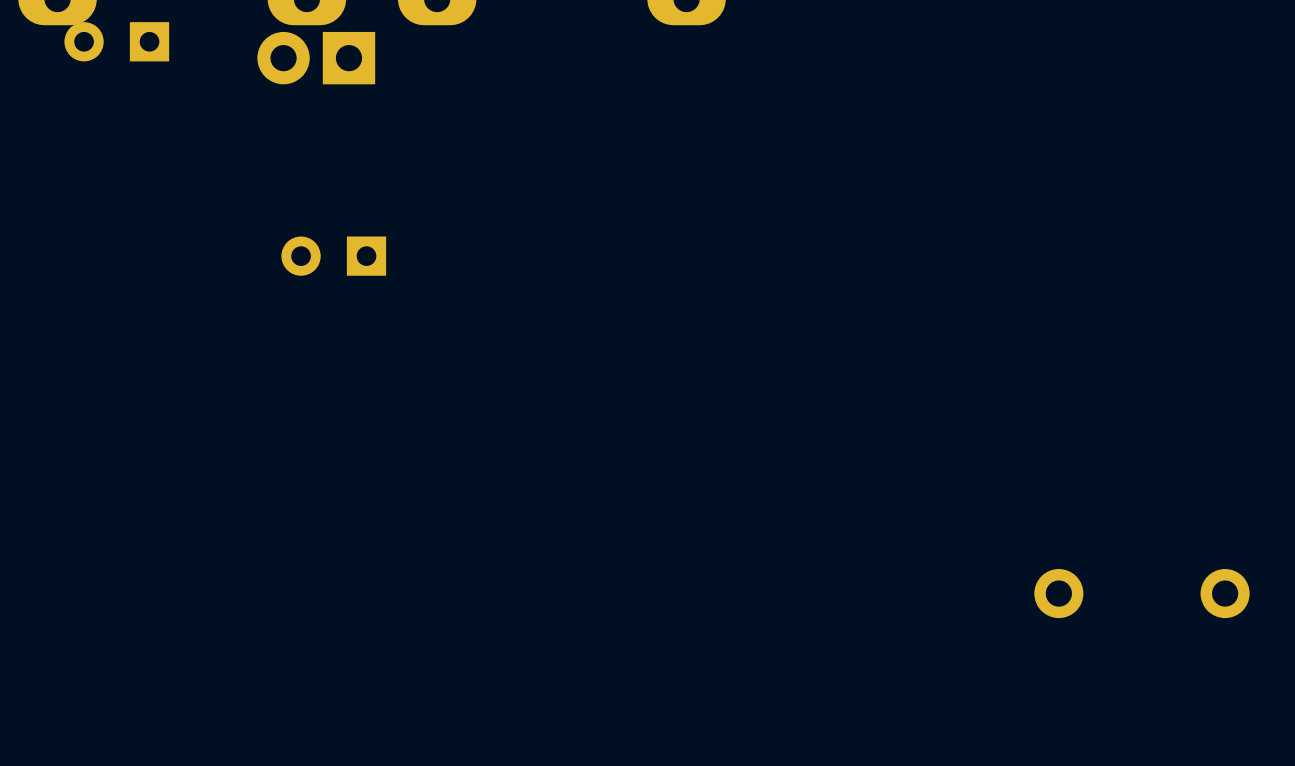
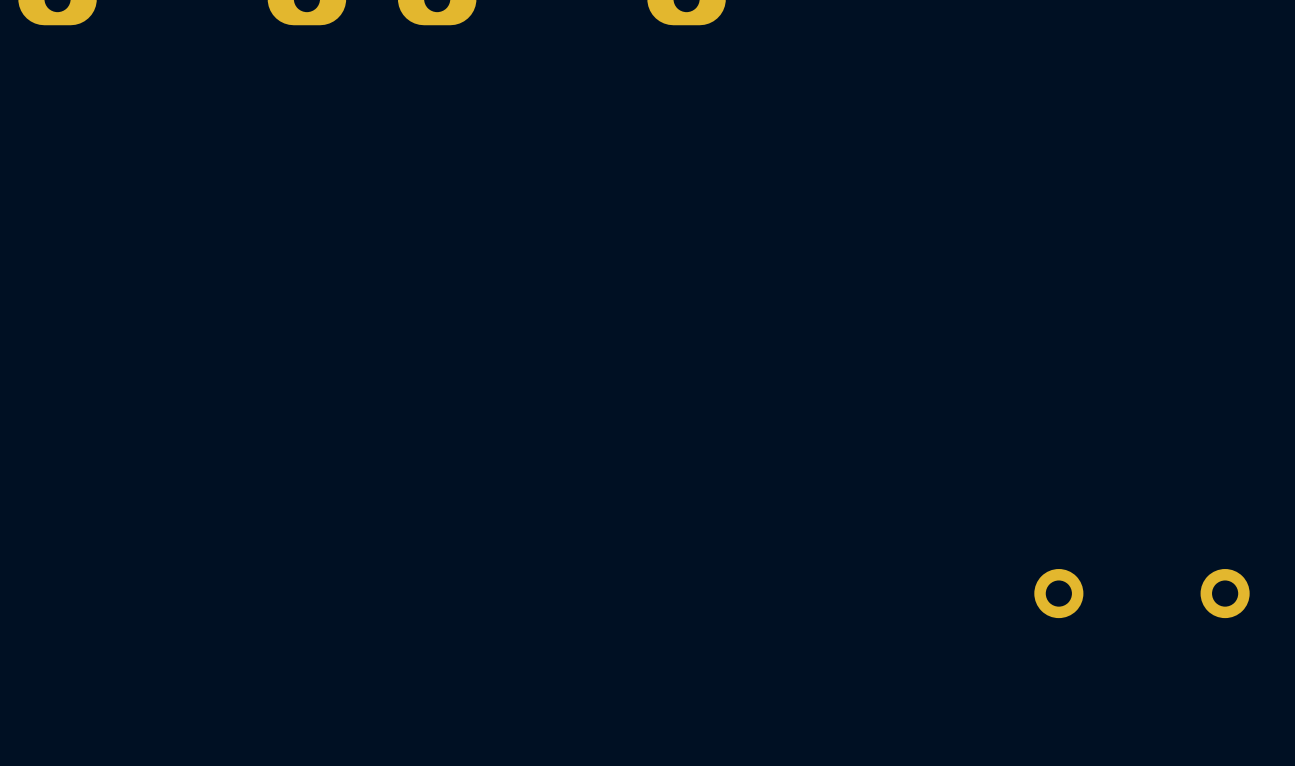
part: (116, 41) -> none
part: (316, 58) -> none
part: (333, 256) -> none

